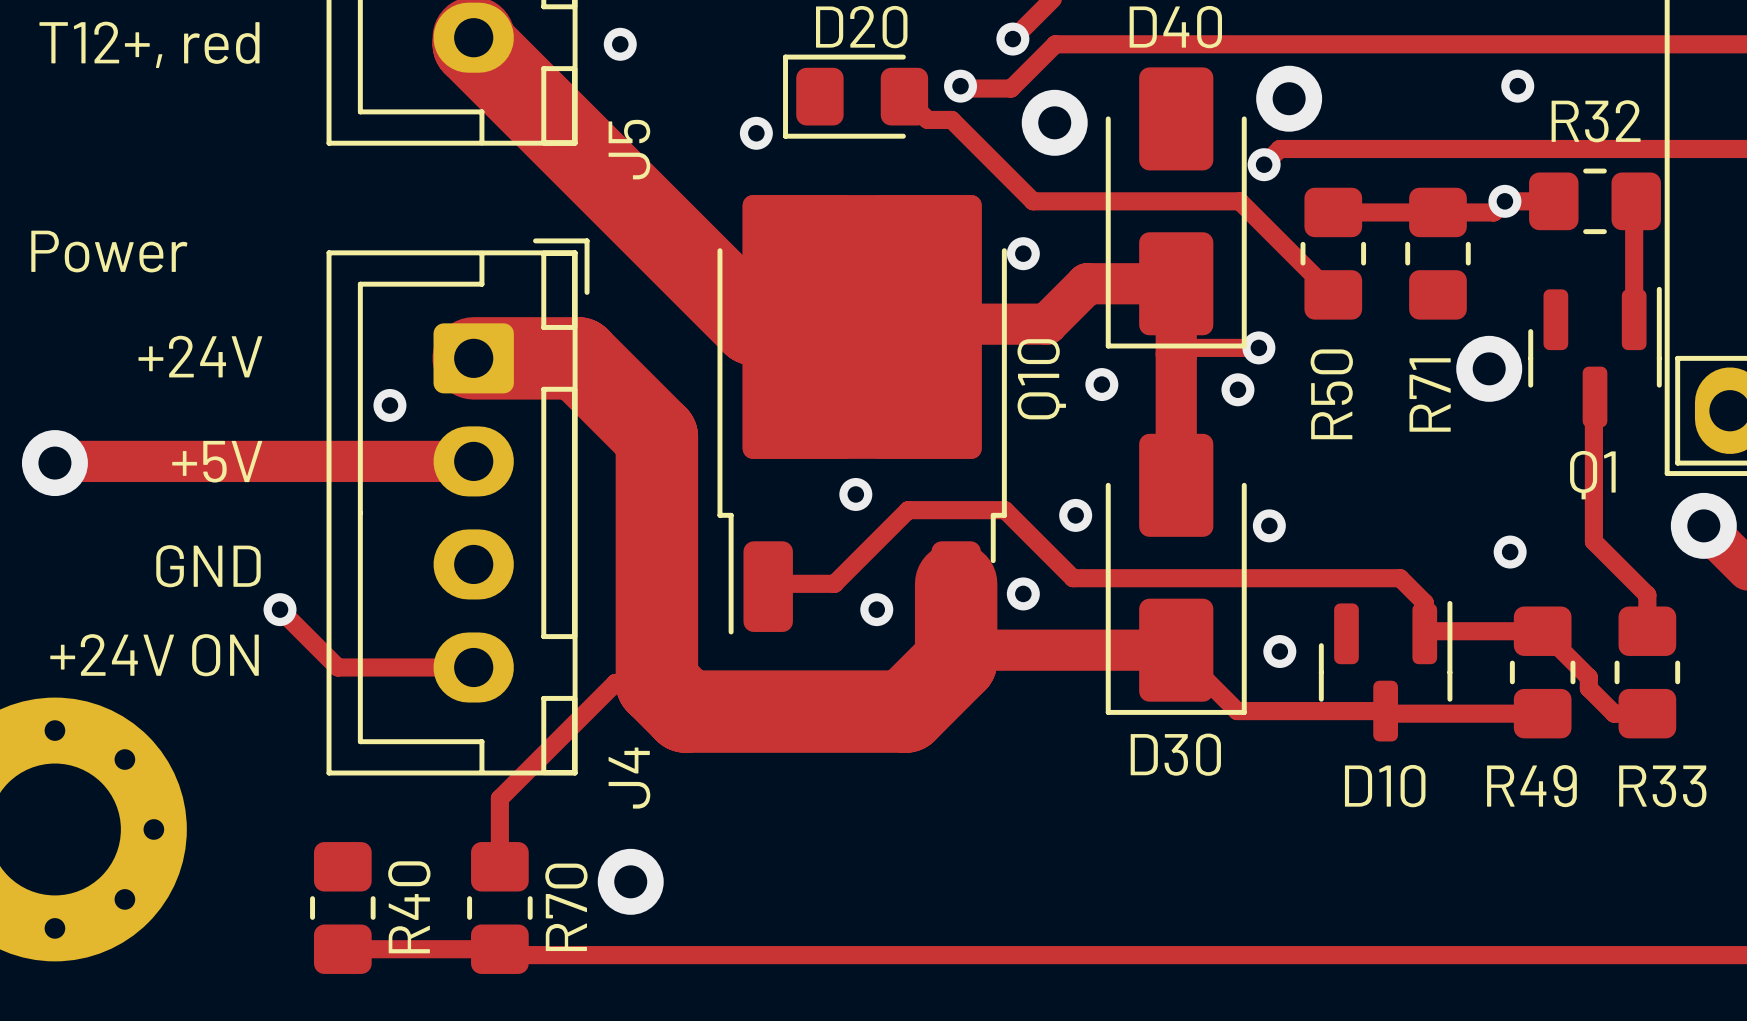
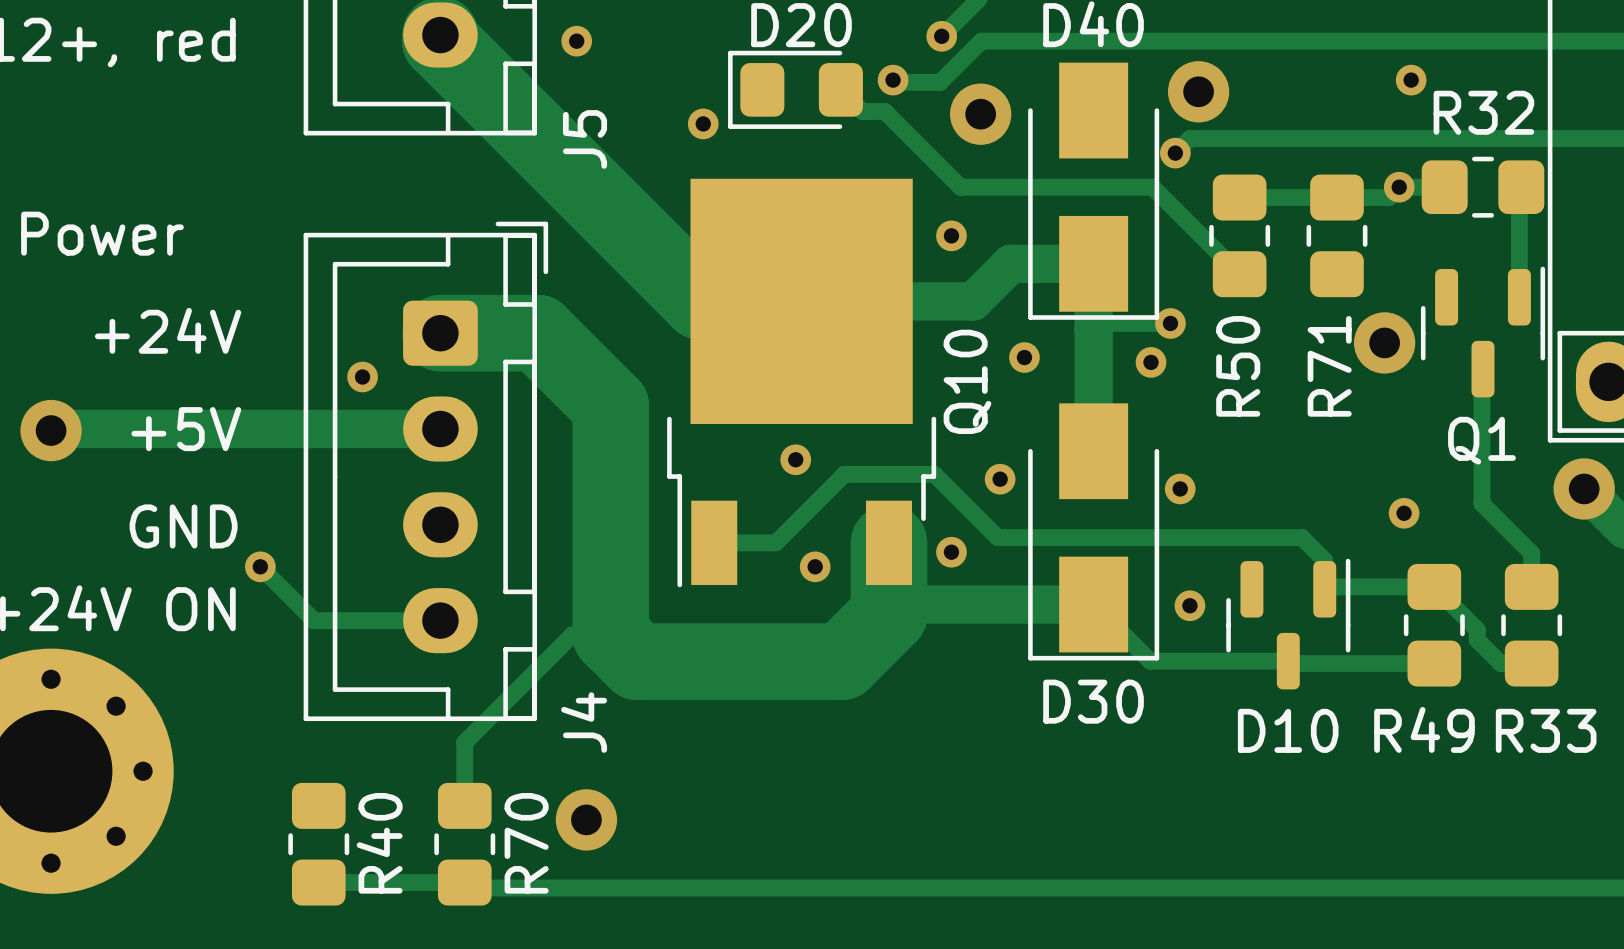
D40 footprint: [1105, 67, 1247, 349] -> [1028, 62, 1160, 320]
Q10 footprint: [717, 195, 1007, 635] -> [667, 178, 937, 588]
D30 footprint: [1105, 433, 1247, 715] -> [1028, 403, 1160, 661]

